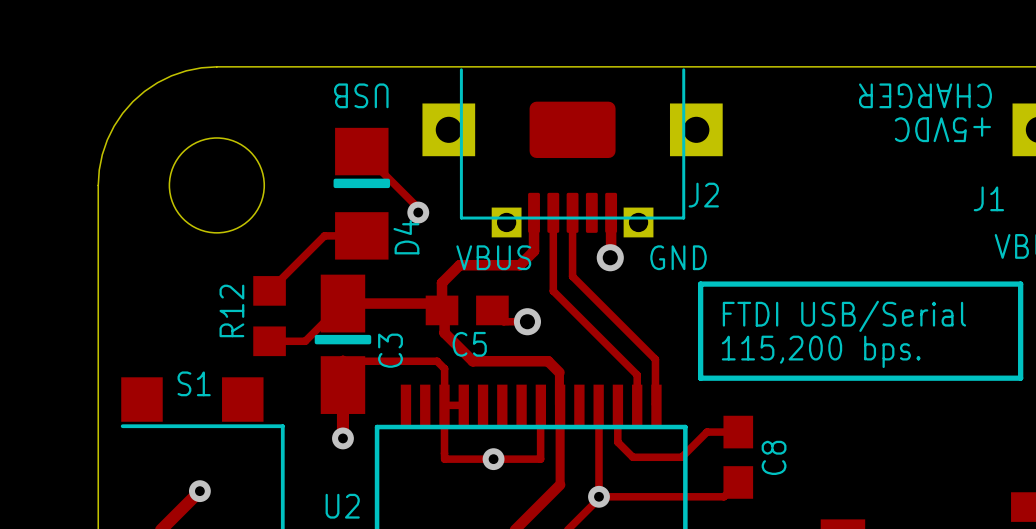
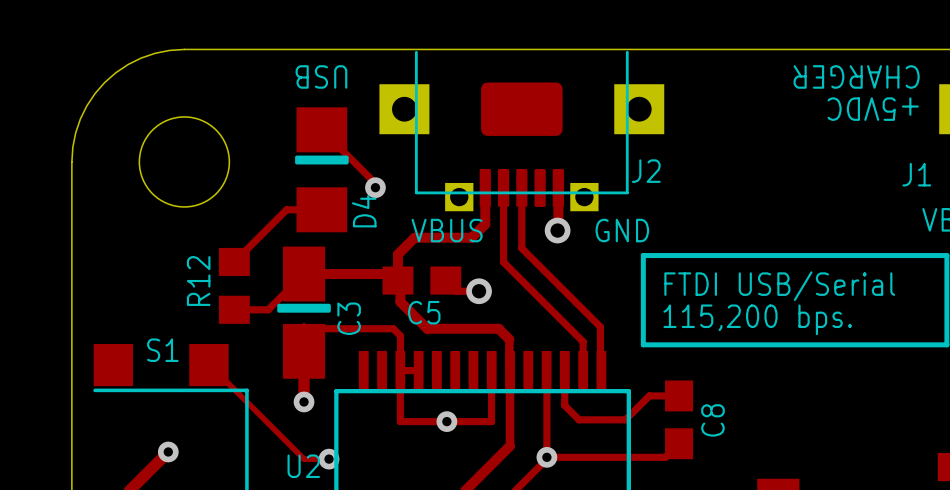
track: none -> (208, 365) (304, 459) (329, 459)
via: none -> (329, 459)

